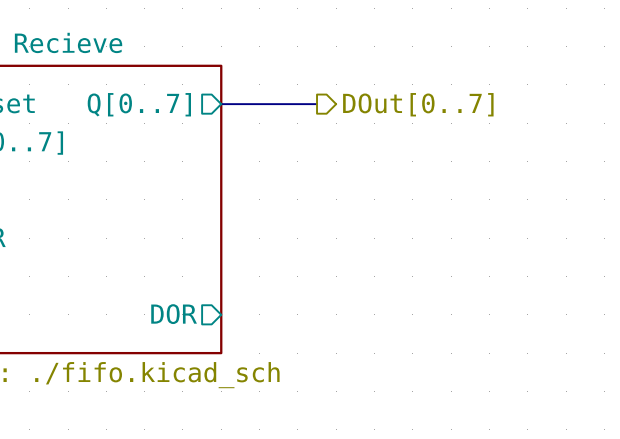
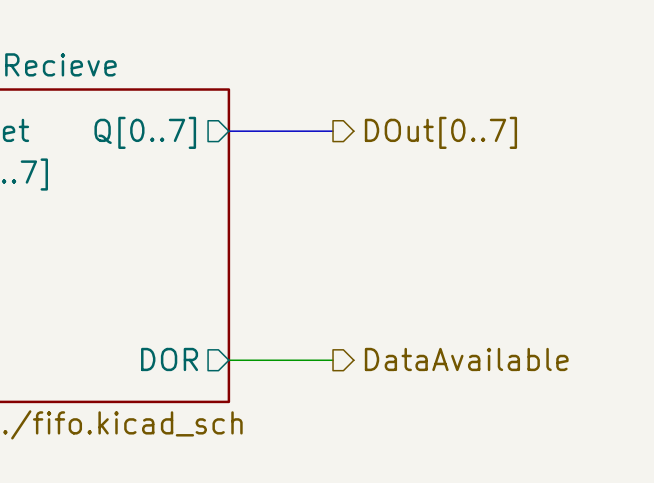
hierarchical label: none -> DataAvailable (466, 359)
wire: none -> (228, 360) (333, 360)

